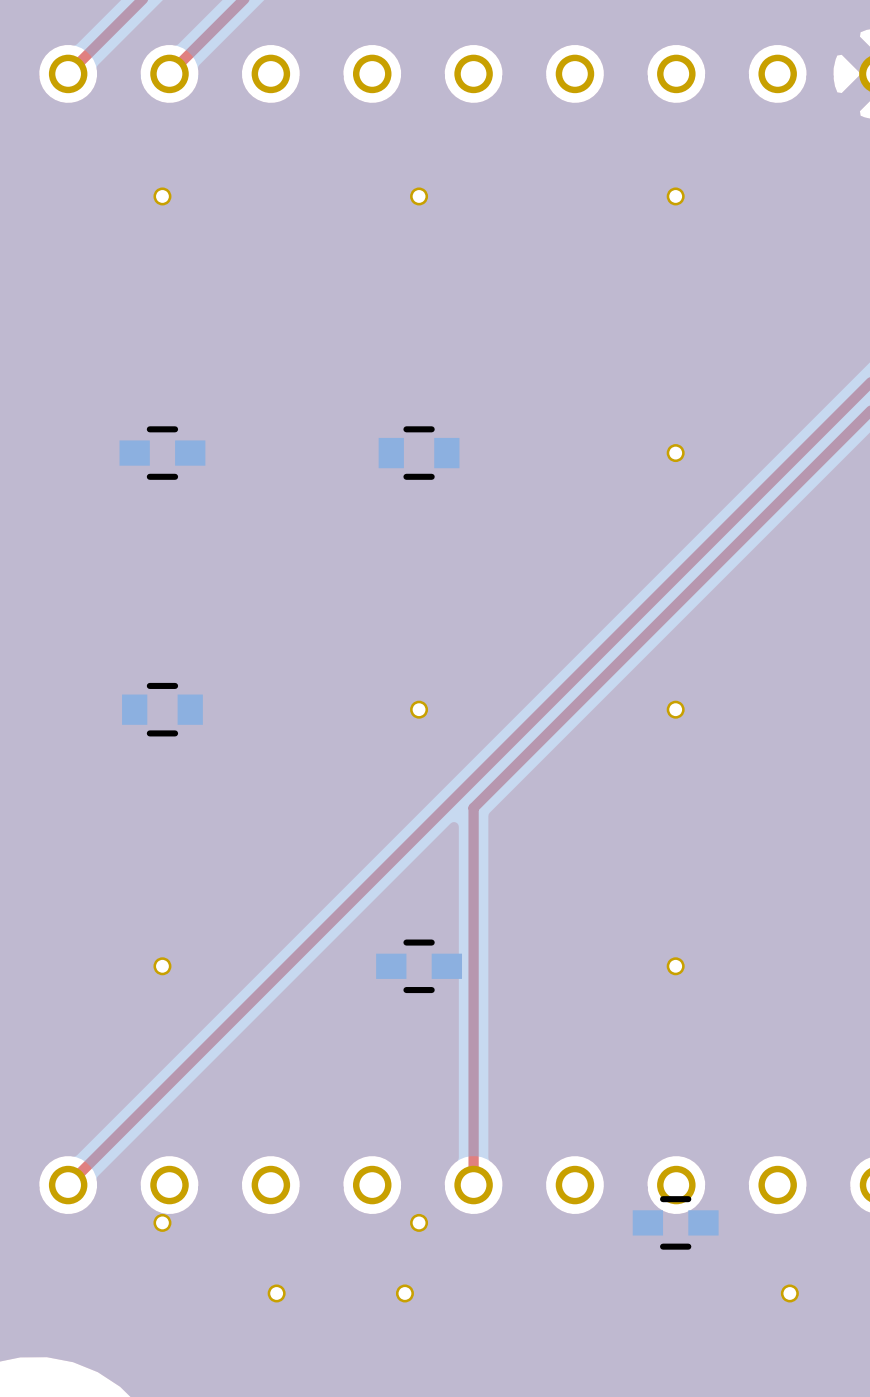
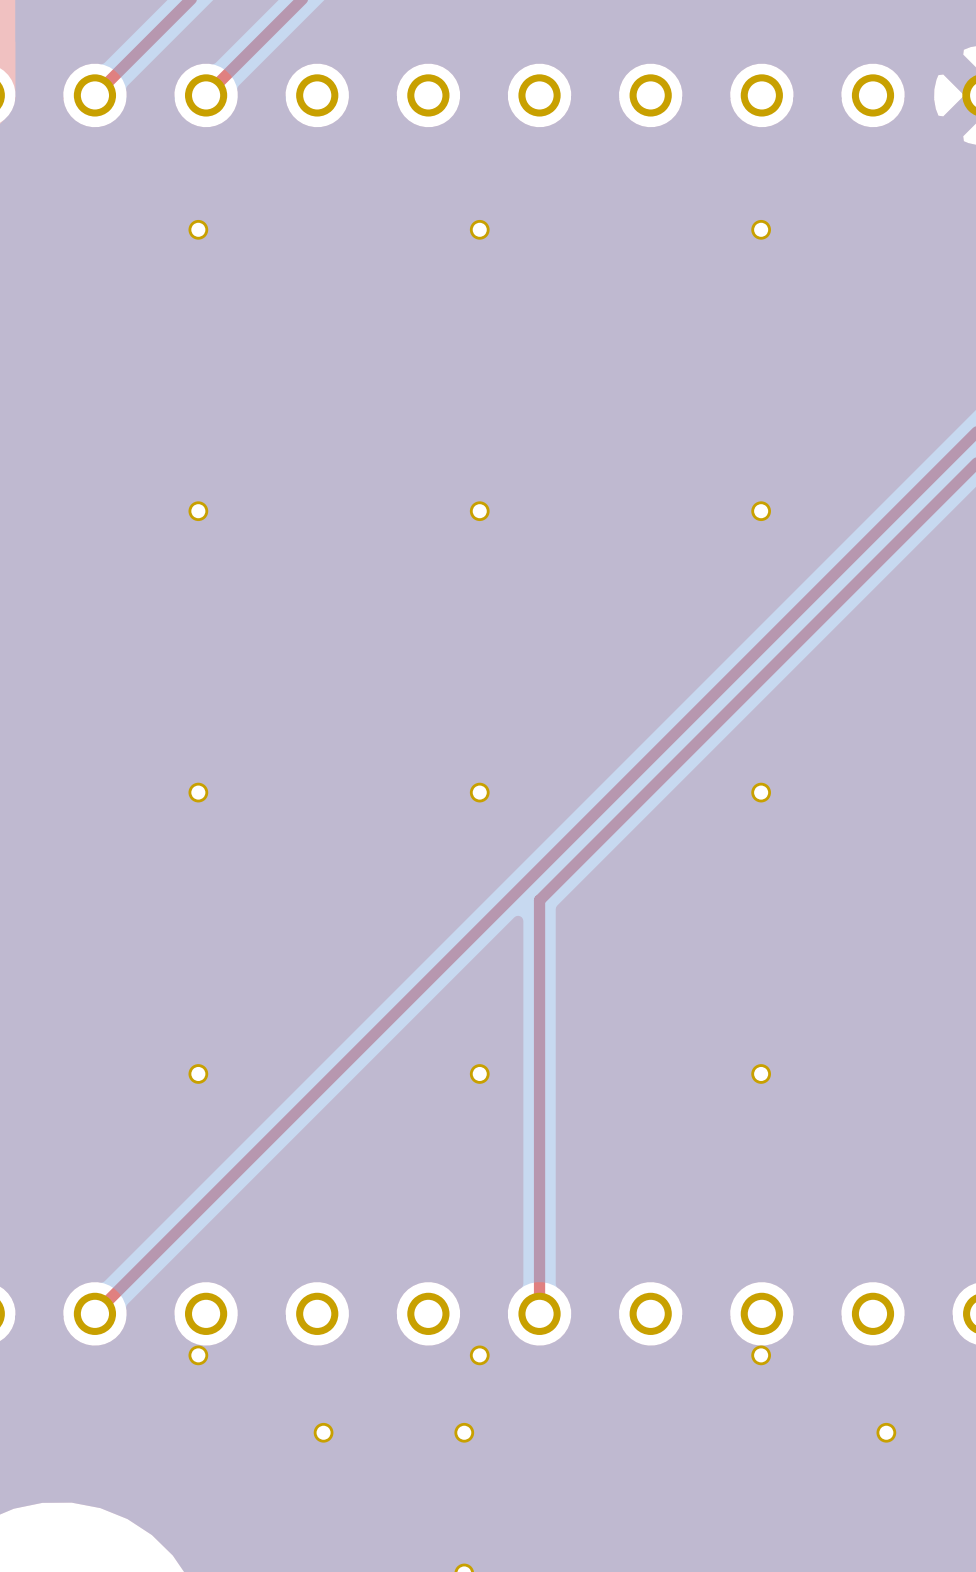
part footprint: [119, 426, 206, 480] -> [188, 501, 209, 522]
part footprint: [378, 426, 460, 480] -> [469, 501, 490, 522]
part footprint: [122, 682, 203, 737] -> [188, 782, 209, 803]
part footprint: [376, 939, 463, 994] -> [469, 1064, 490, 1084]
part footprint: [632, 1196, 719, 1250] -> [751, 1345, 771, 1366]

